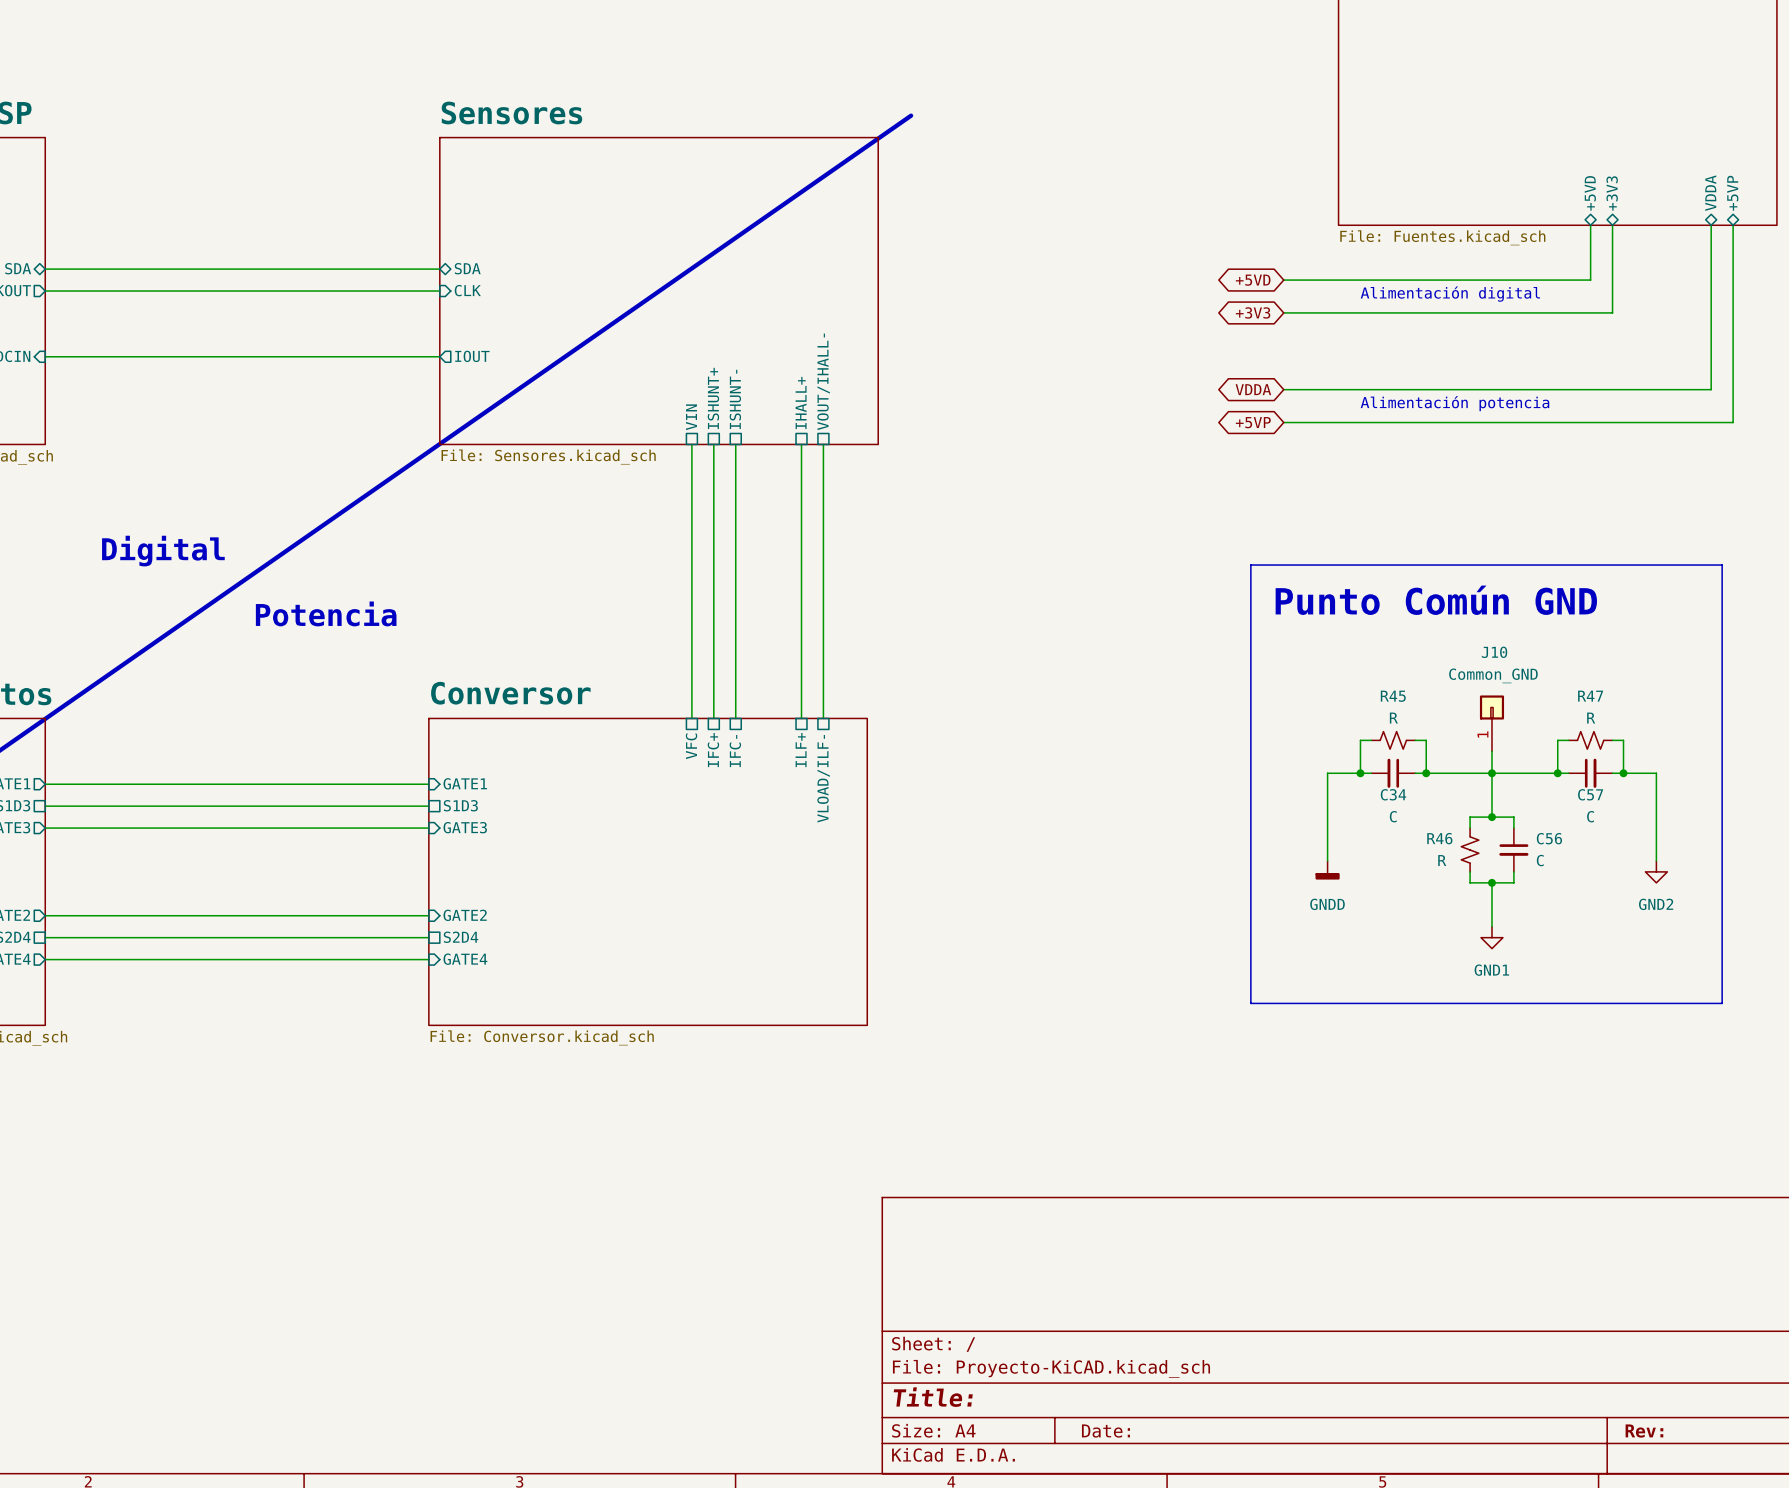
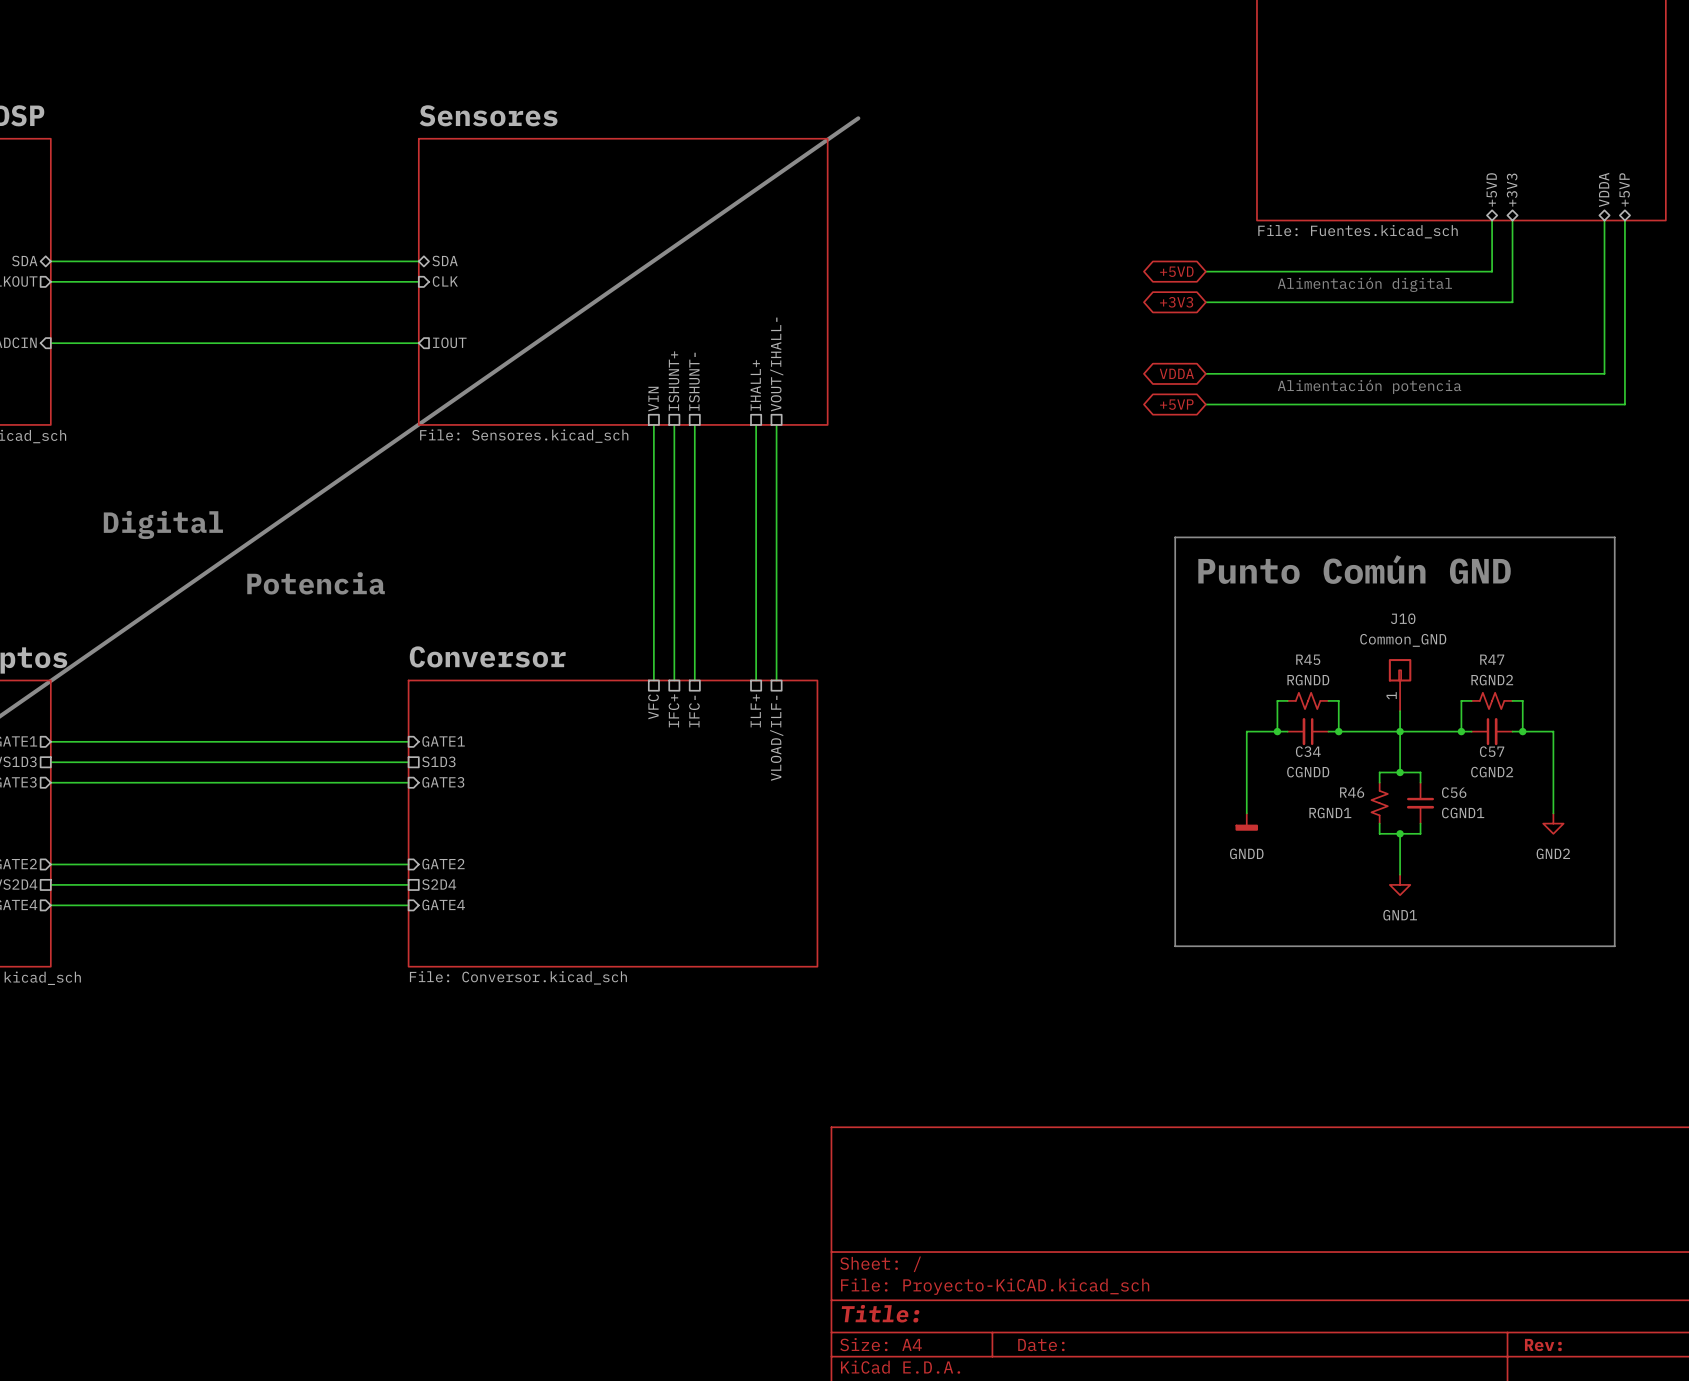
R45 value: R (1393, 718) -> RGNDD (1308, 680)
R47 value: R (1591, 718) -> RGND2 (1492, 680)
C34 value: C (1393, 816) -> CGNDD (1308, 772)
C57 value: C (1590, 816) -> CGND2 (1492, 772)
R46 value: R (1442, 860) -> RGND1 (1330, 812)
C56 value: C (1540, 860) -> CGND1 (1463, 812)

